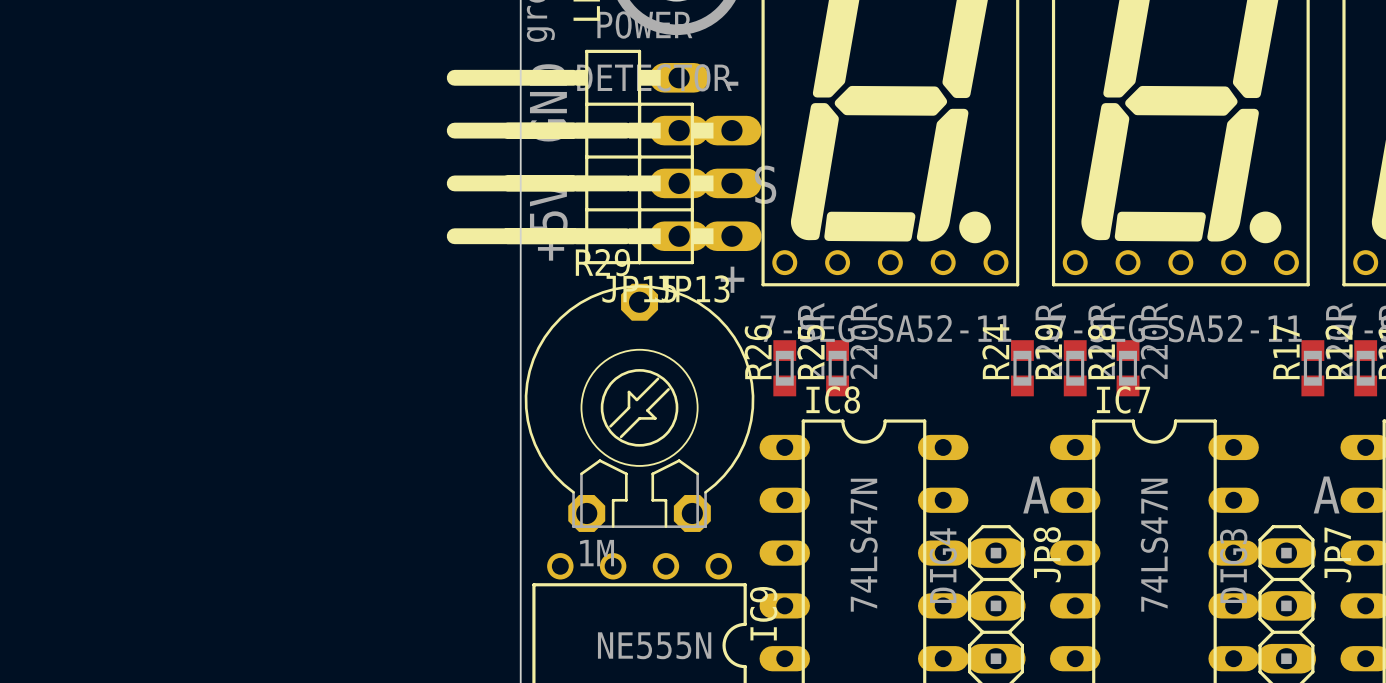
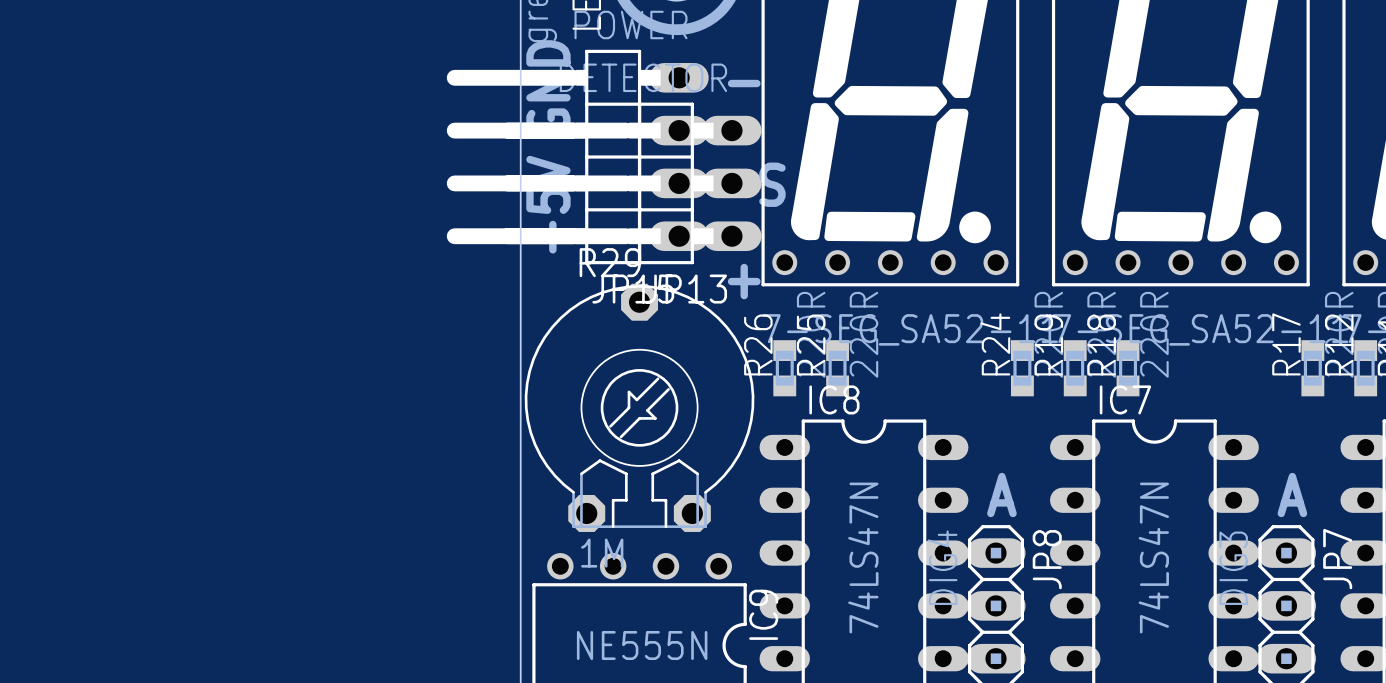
text position: A (1036, 494) -> A (1001, 494)
text position: A (1326, 494) -> A (1292, 494)

